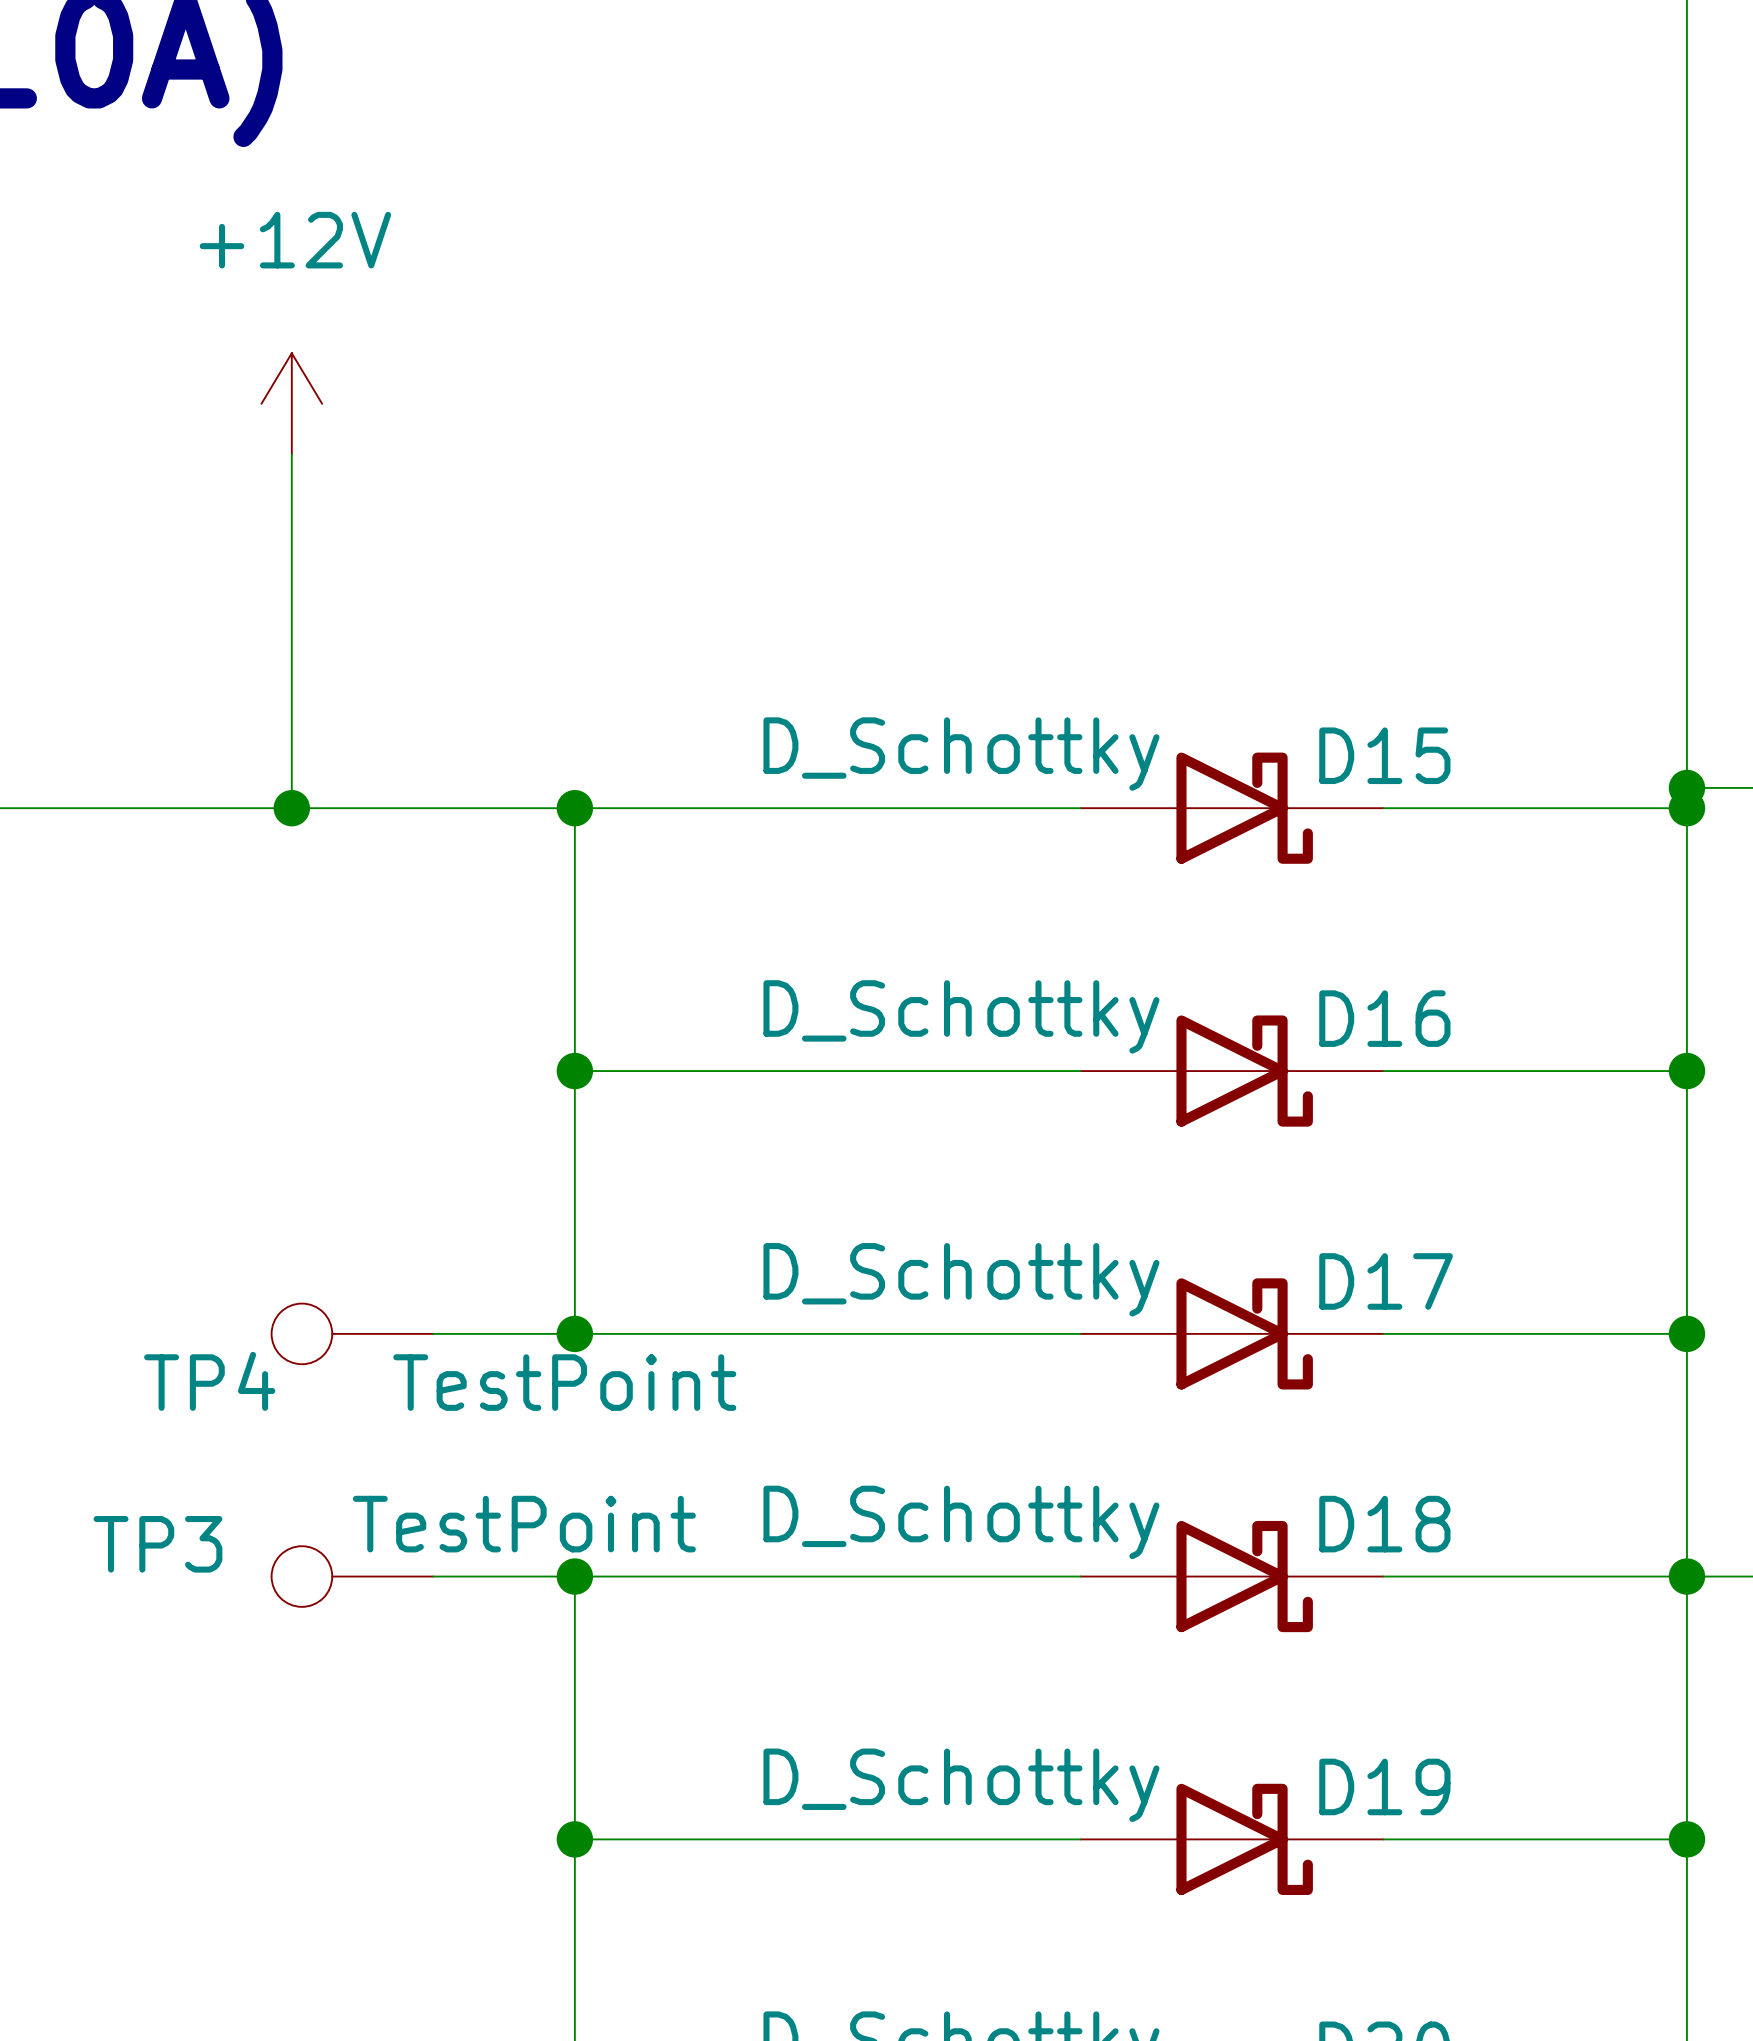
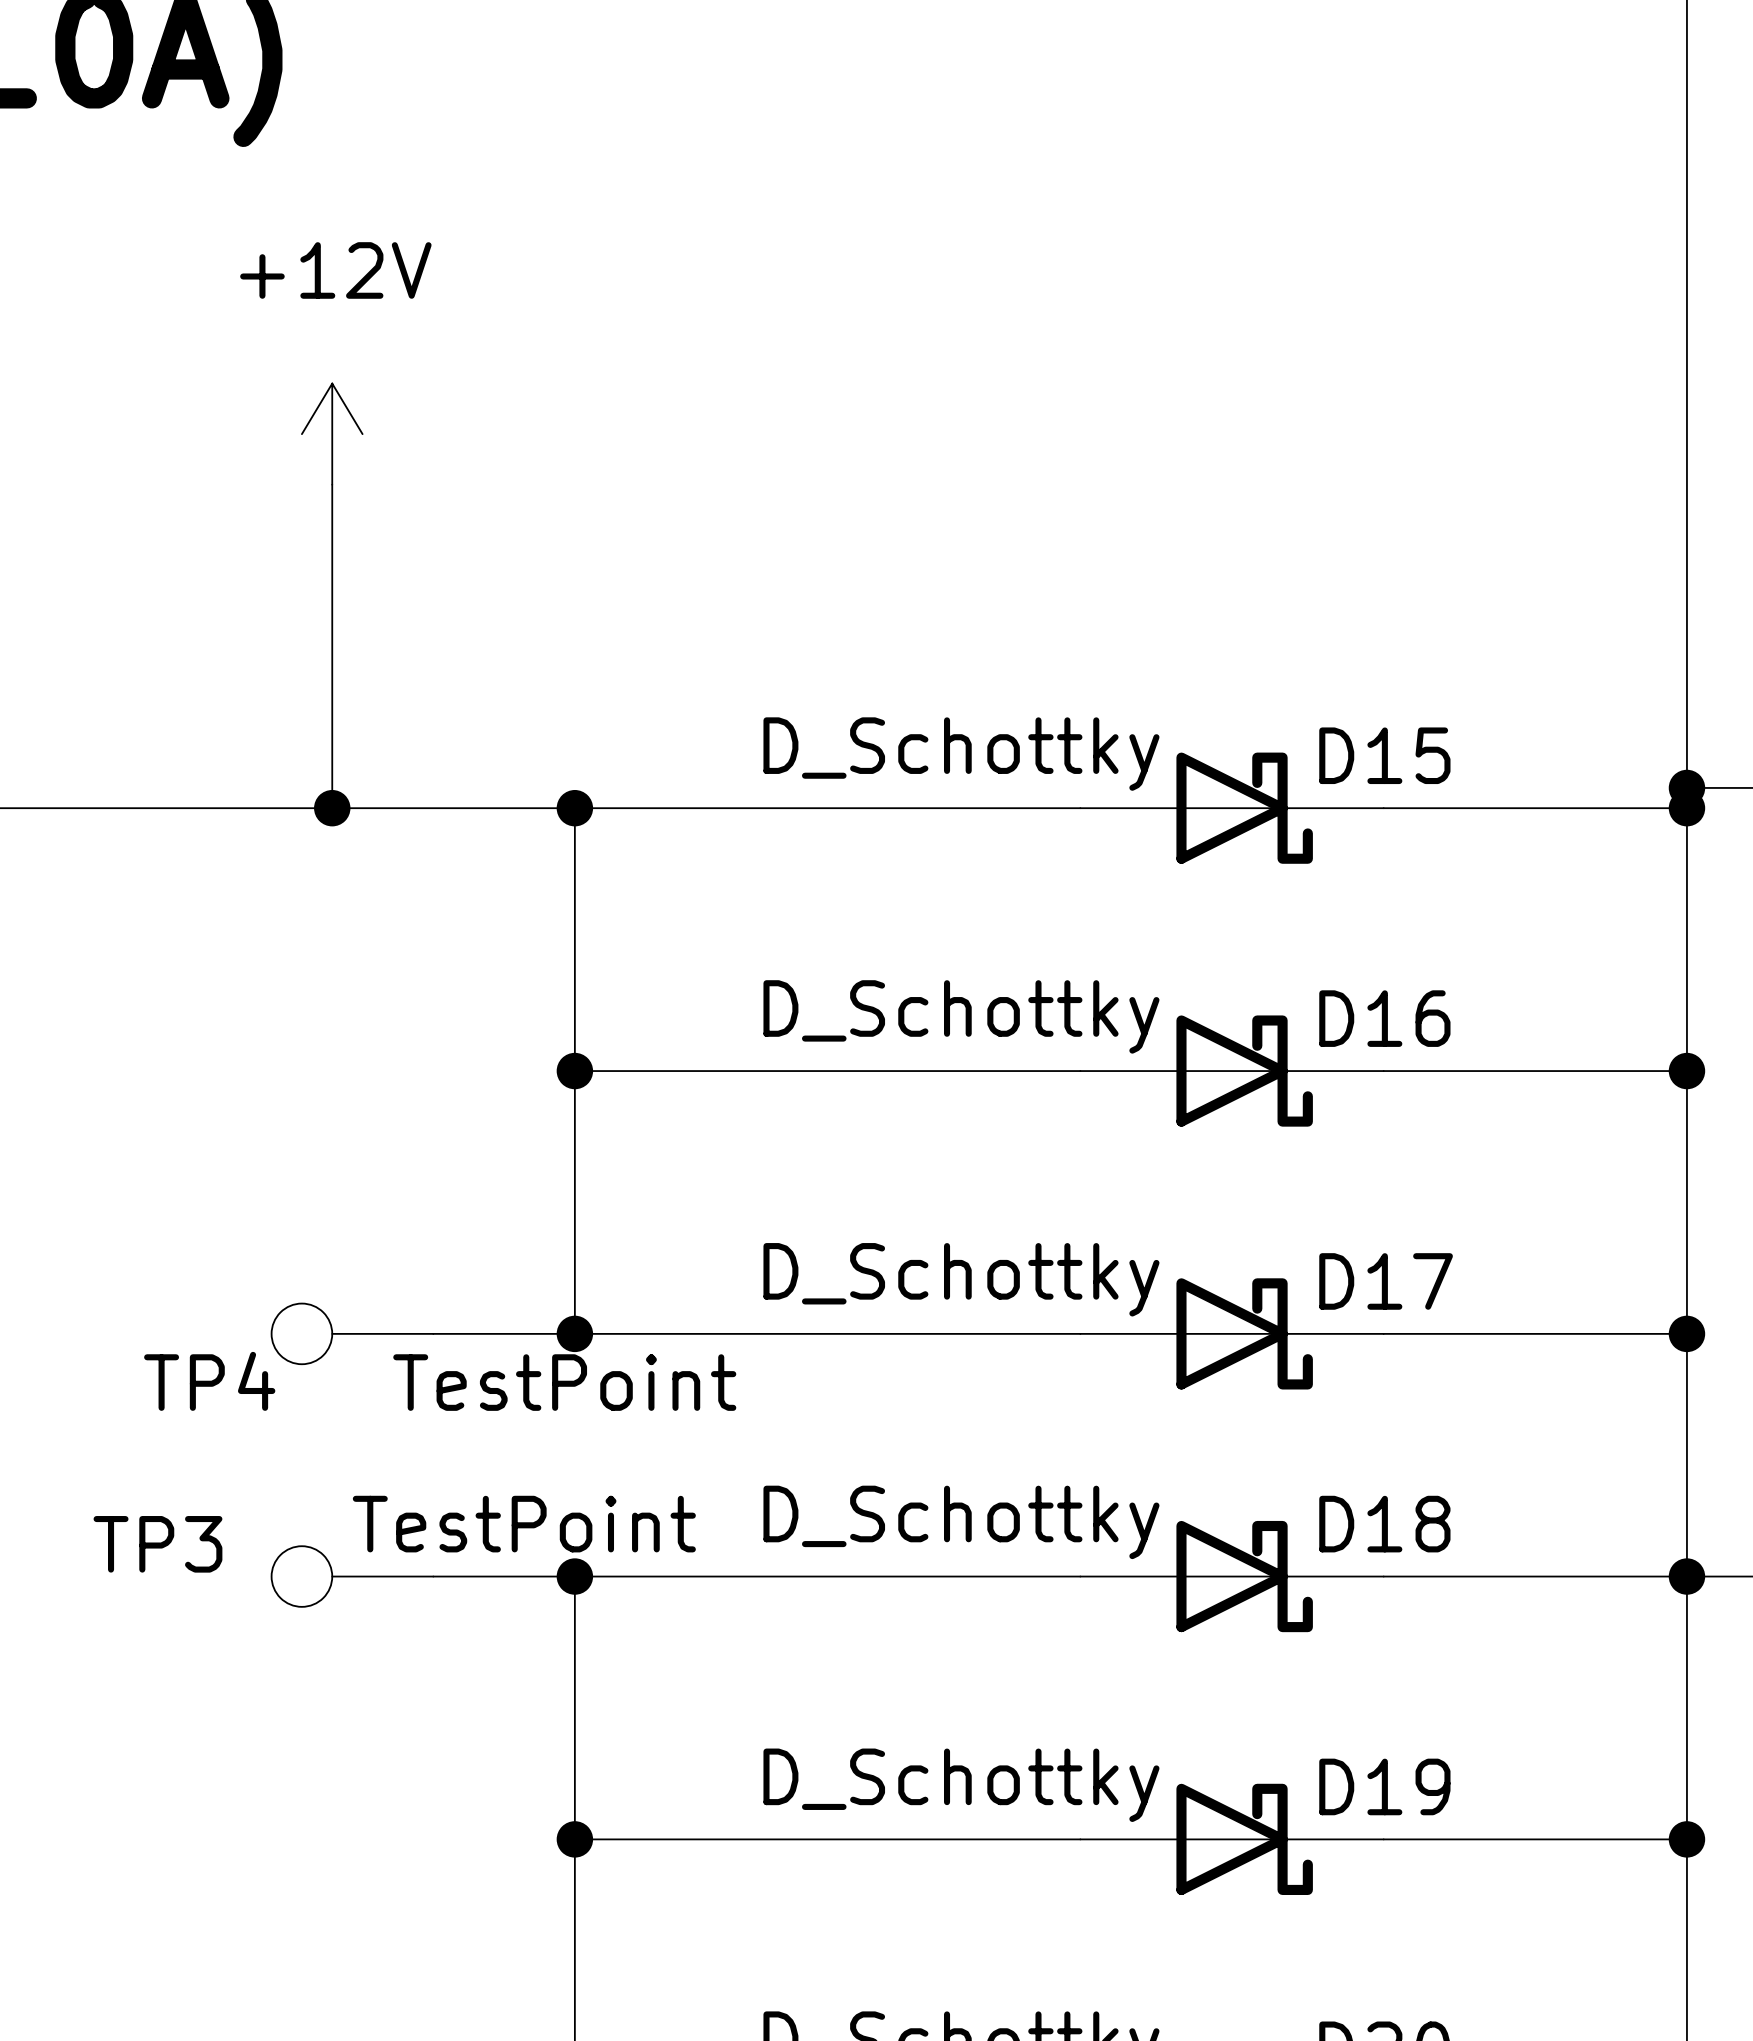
power symbol position: +12V (291, 403) -> +12V (332, 434)
wire: (291, 454) (291, 808) -> none
wire: none -> (332, 484) (332, 808)
junction position: (291, 808) -> (332, 808)

